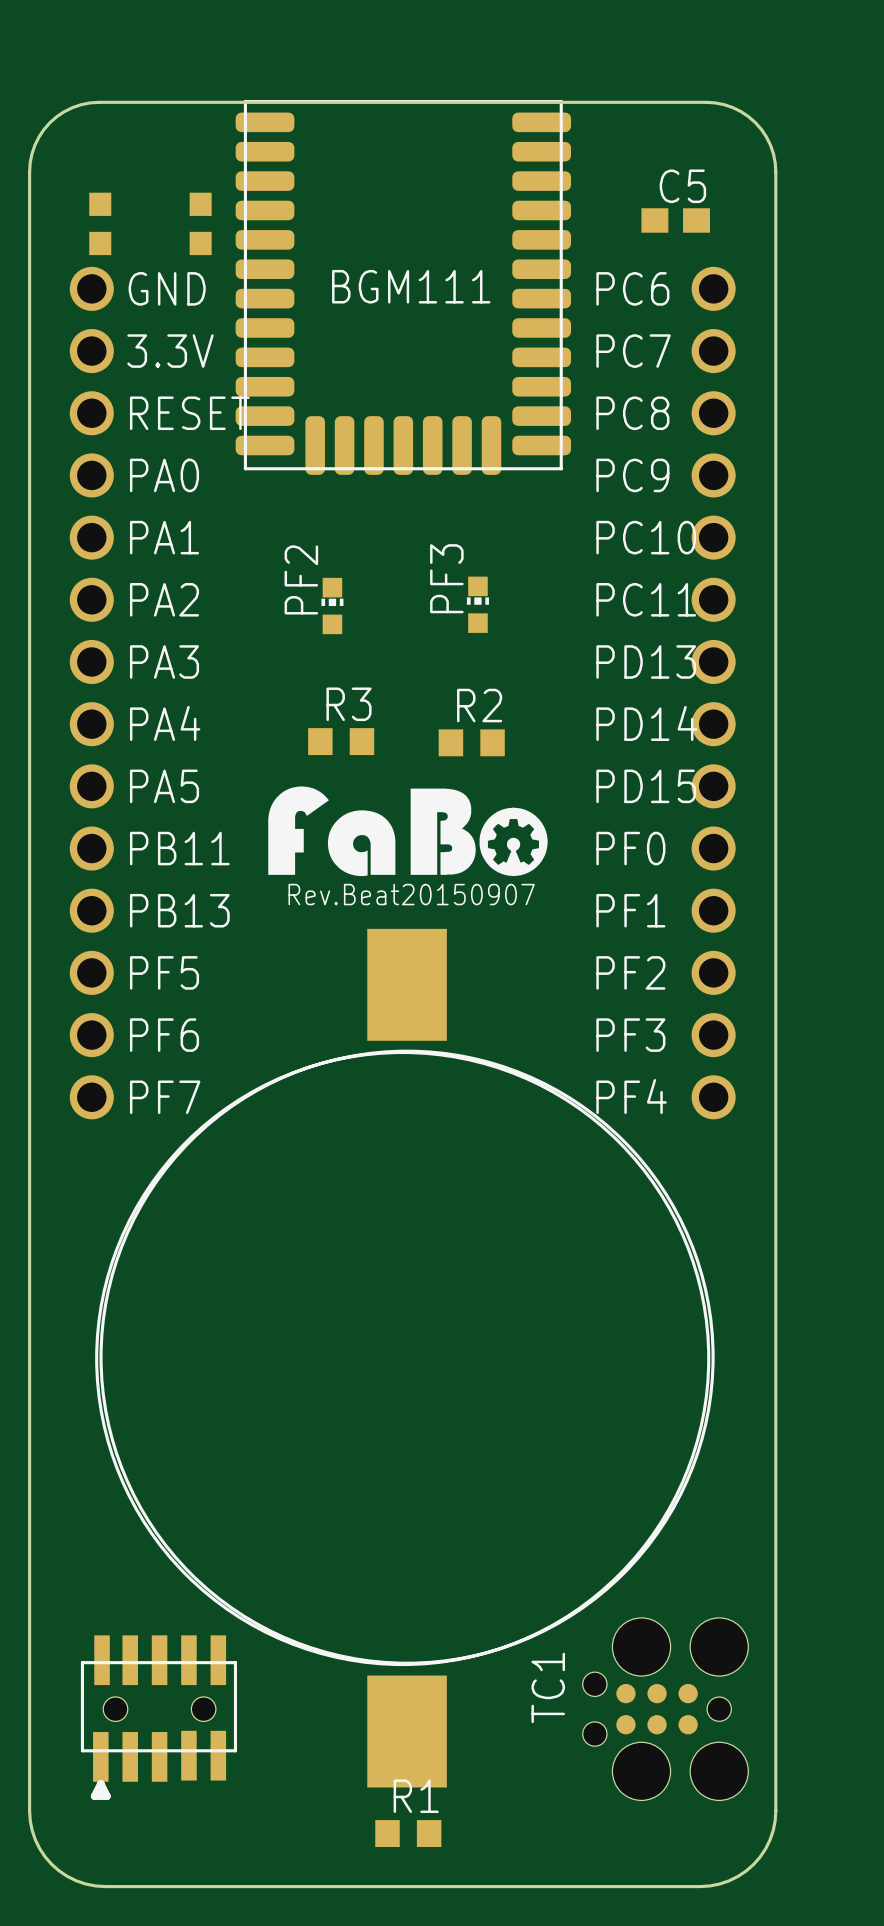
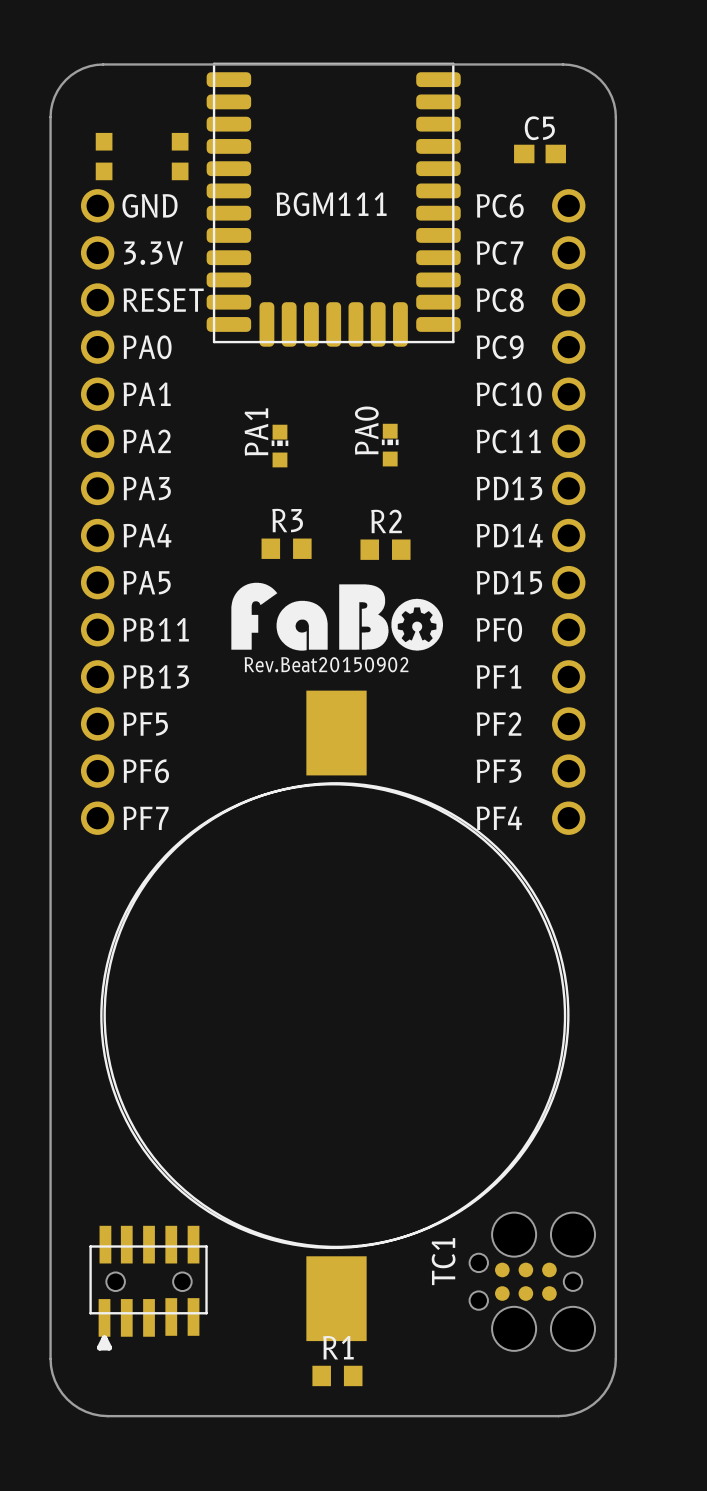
PF3 name: PF3 (446, 578) -> PA0 (366, 430)
PF2 name: PF2 (301, 579) -> PA1 (256, 431)
text: Rev.Beat20150907 (411, 894) -> Rev.Beat20150902 (326, 664)

